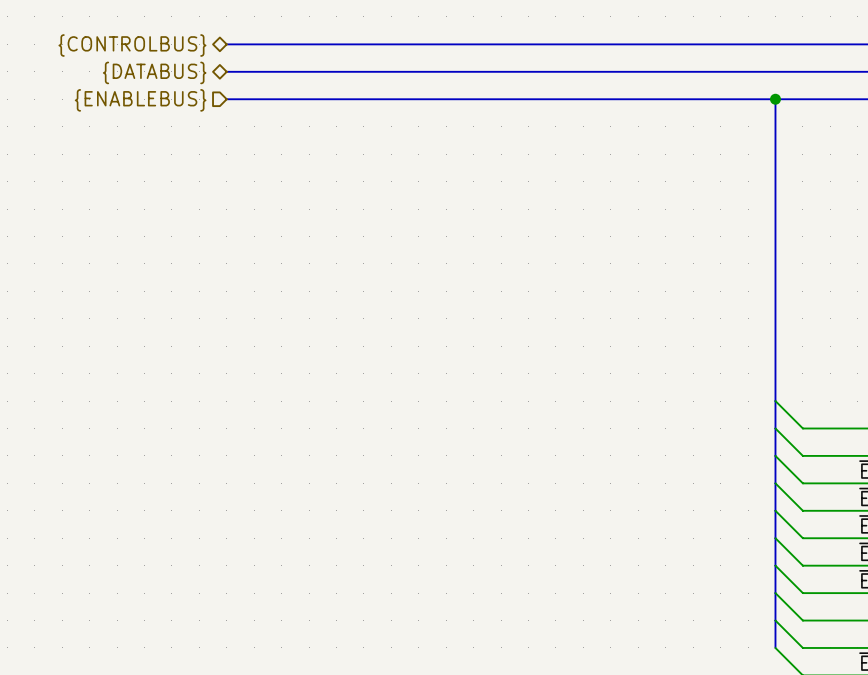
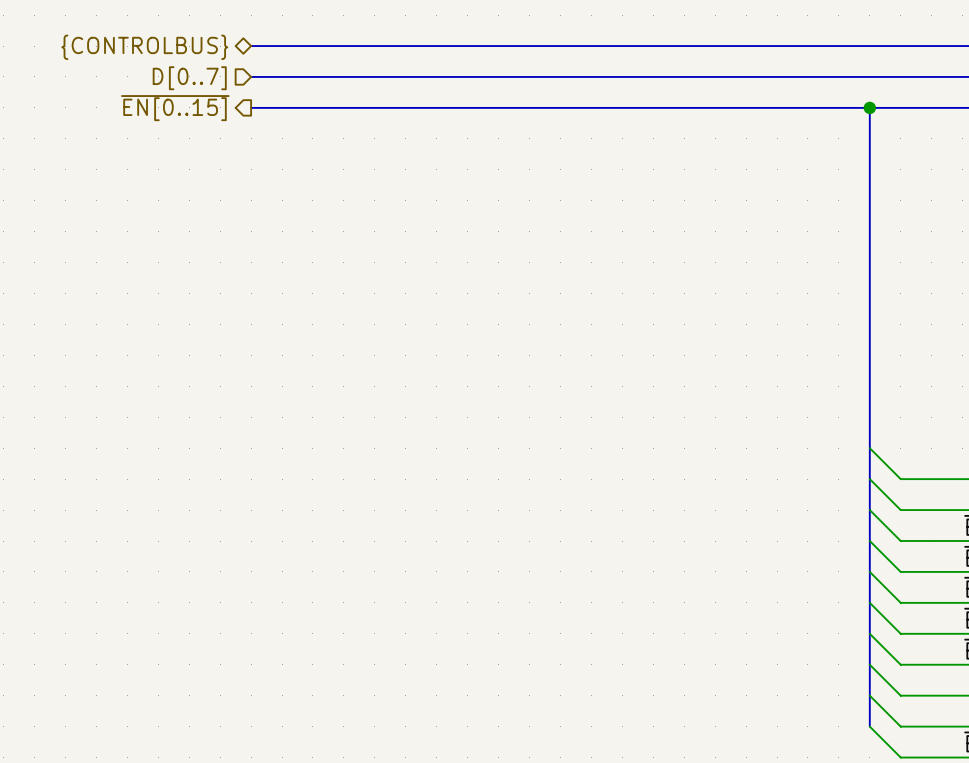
hierarchical label shape: bidirectional (154, 72) -> input (189, 78)
hierarchical label: {DATABUS} (154, 72) -> D[0..7] (189, 78)
hierarchical label shape: input (140, 100) -> output (175, 108)
hierarchical label: {ENABLEBUS} (140, 100) -> ~{EN[0..15]} (175, 108)

